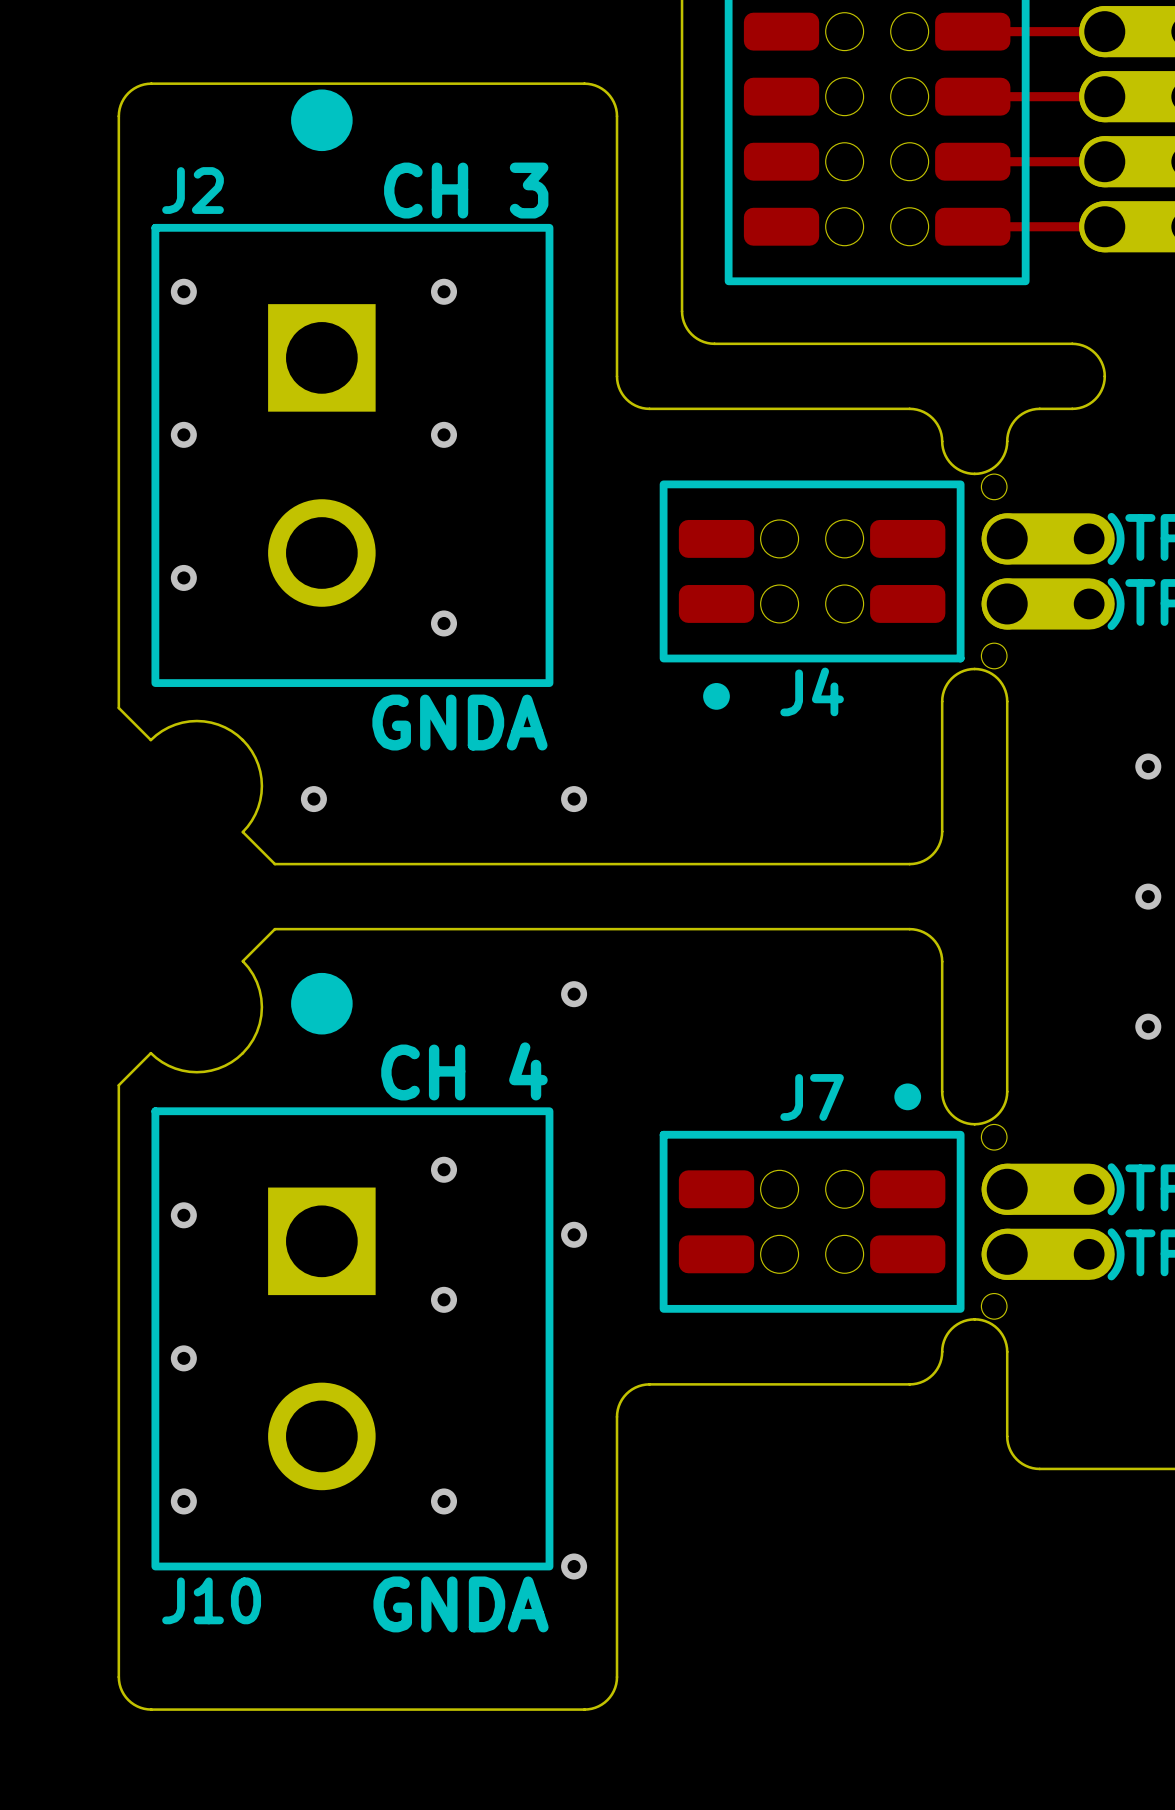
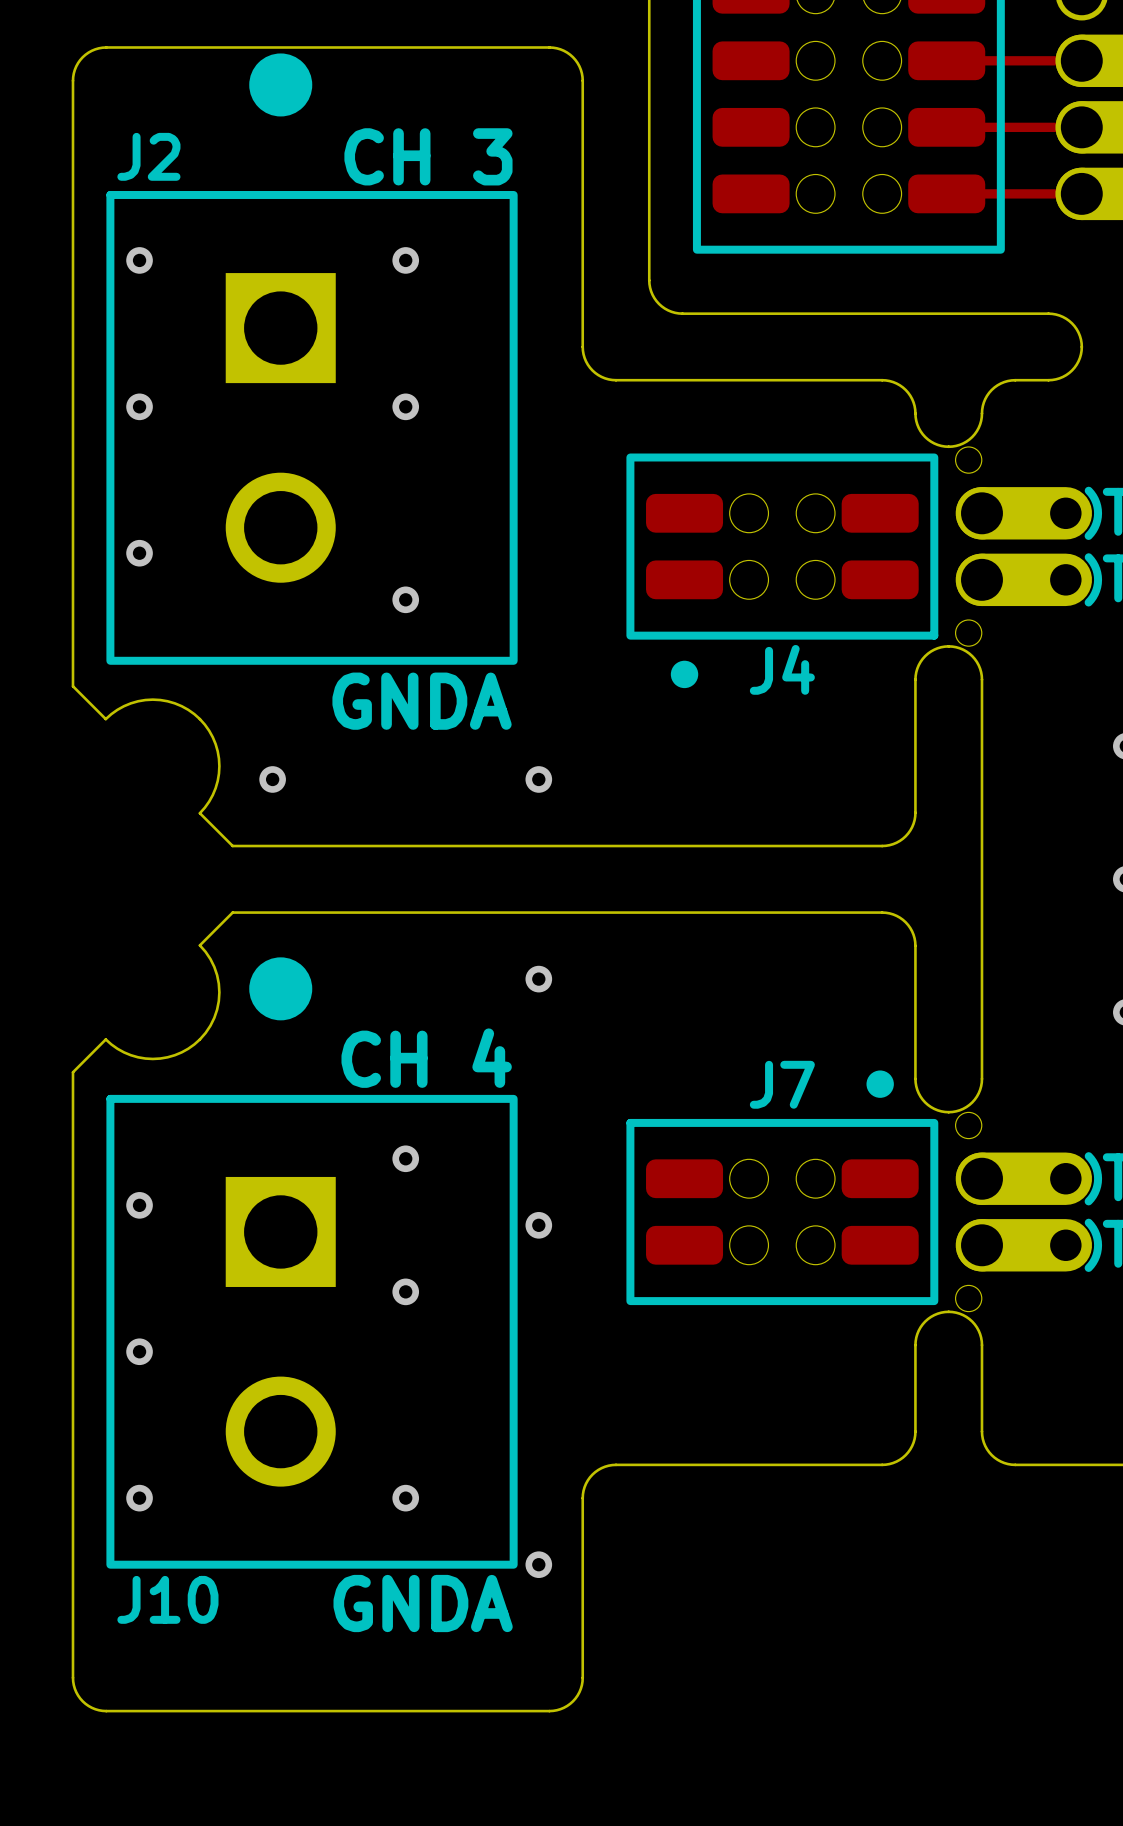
board edge: (942, 1351) (938, 1365) (932, 1374) (923, 1381) (913, 1384) (649, 1384) (635, 1387) (621, 1399) (617, 1413) (617, 1501) -> (915, 1345) (915, 1435) (910, 1449) (896, 1461) (882, 1464) (612, 1465) (601, 1468) (589, 1477) (584, 1487) (582, 1498)

